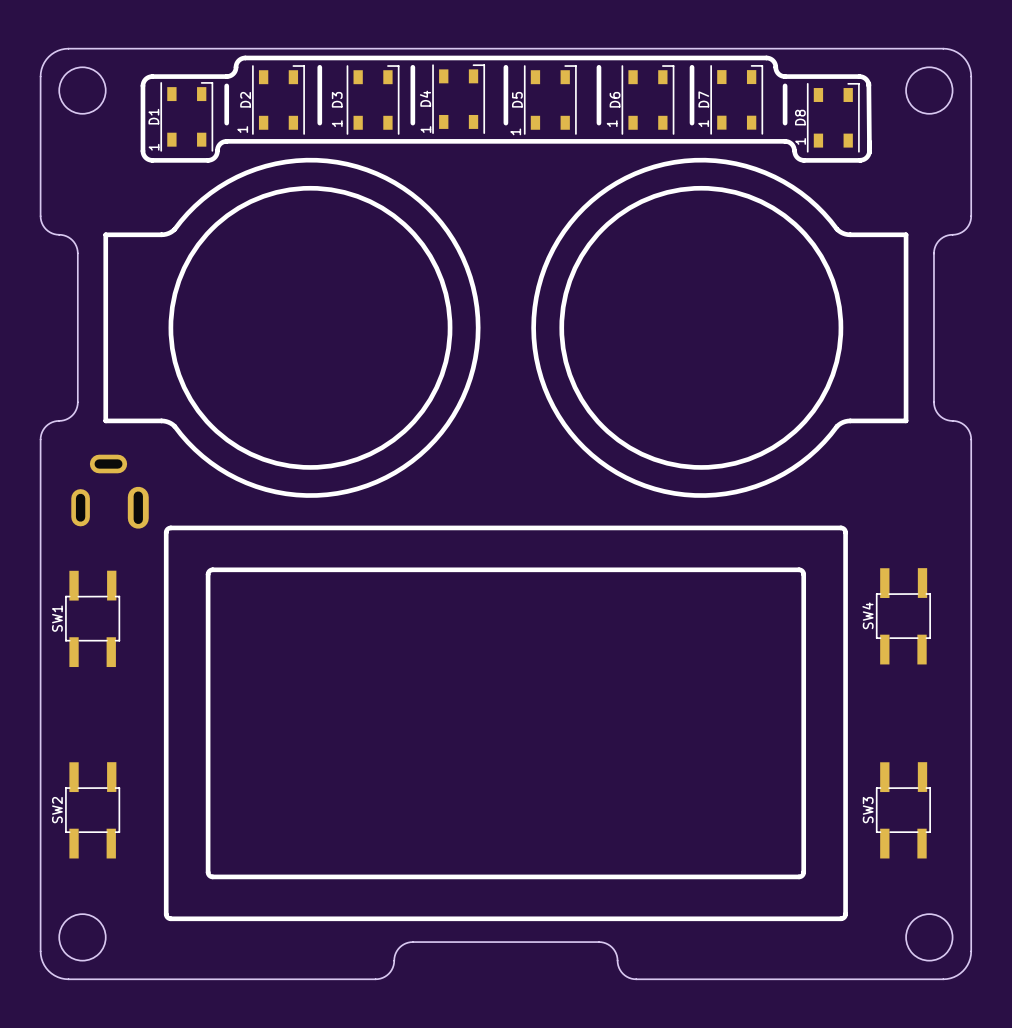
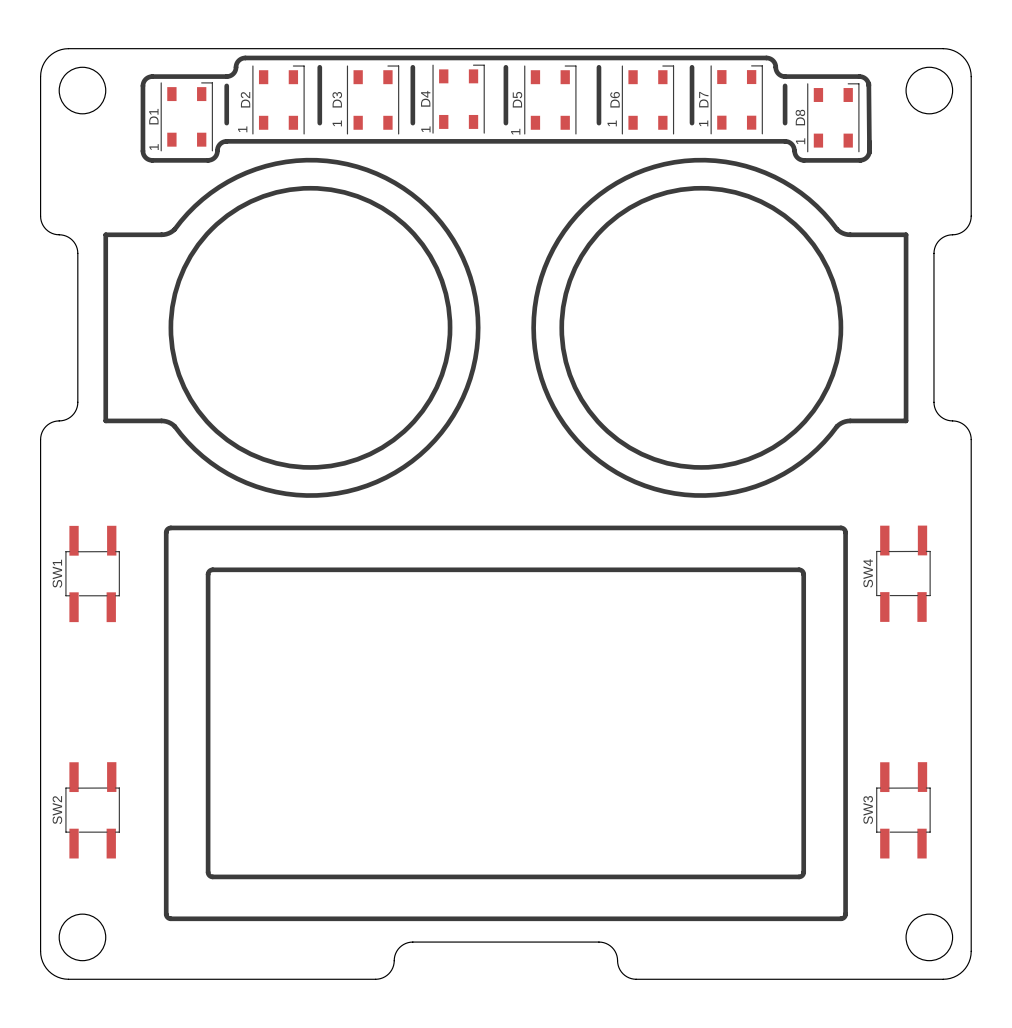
part: (110, 491) -> none
SW4 position: (903, 616) -> (903, 573)
SW1 position: (92, 618) -> (92, 573)

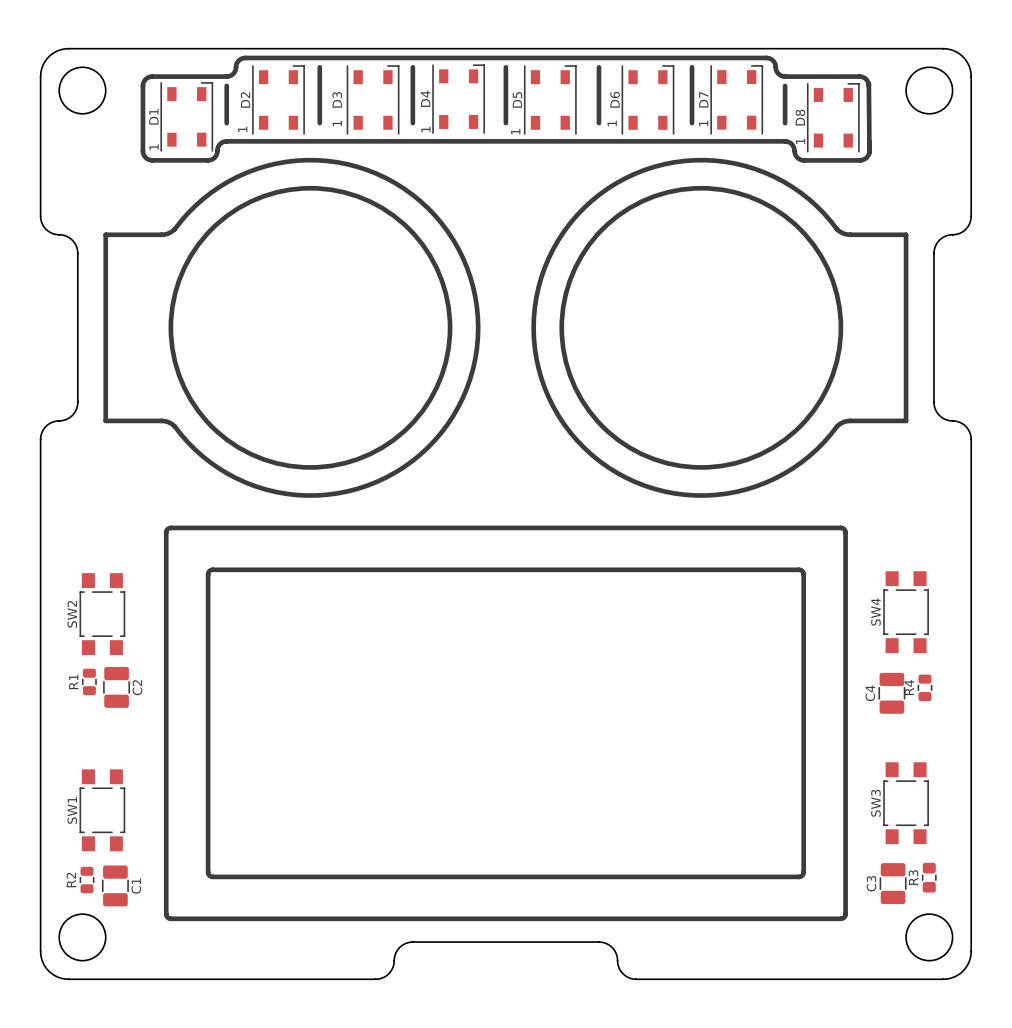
SW1 footprint: [65, 525, 120, 623] -> [79, 769, 126, 852]
SW4 footprint: [876, 525, 931, 622] -> [883, 571, 929, 654]
R1: none -> (89, 681)
C2: none -> (116, 687)
R4: none -> (924, 687)
C4: none -> (891, 693)
SW2 footprint: [65, 762, 120, 859] -> [79, 573, 126, 656]
SW3 footprint: [876, 762, 931, 859] -> [883, 762, 929, 845]
R3: none -> (929, 877)
R2: none -> (87, 880)
C3: none -> (893, 883)
C1: none -> (115, 885)

